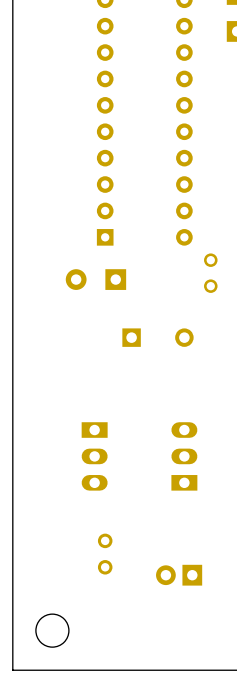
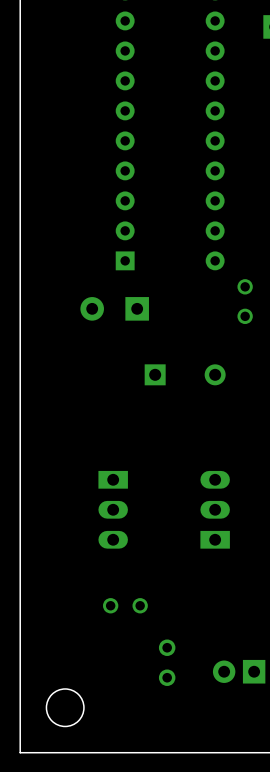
part: none -> (125, 605)
part position: (105, 554) -> (167, 662)
part position: (179, 575) -> (239, 671)

